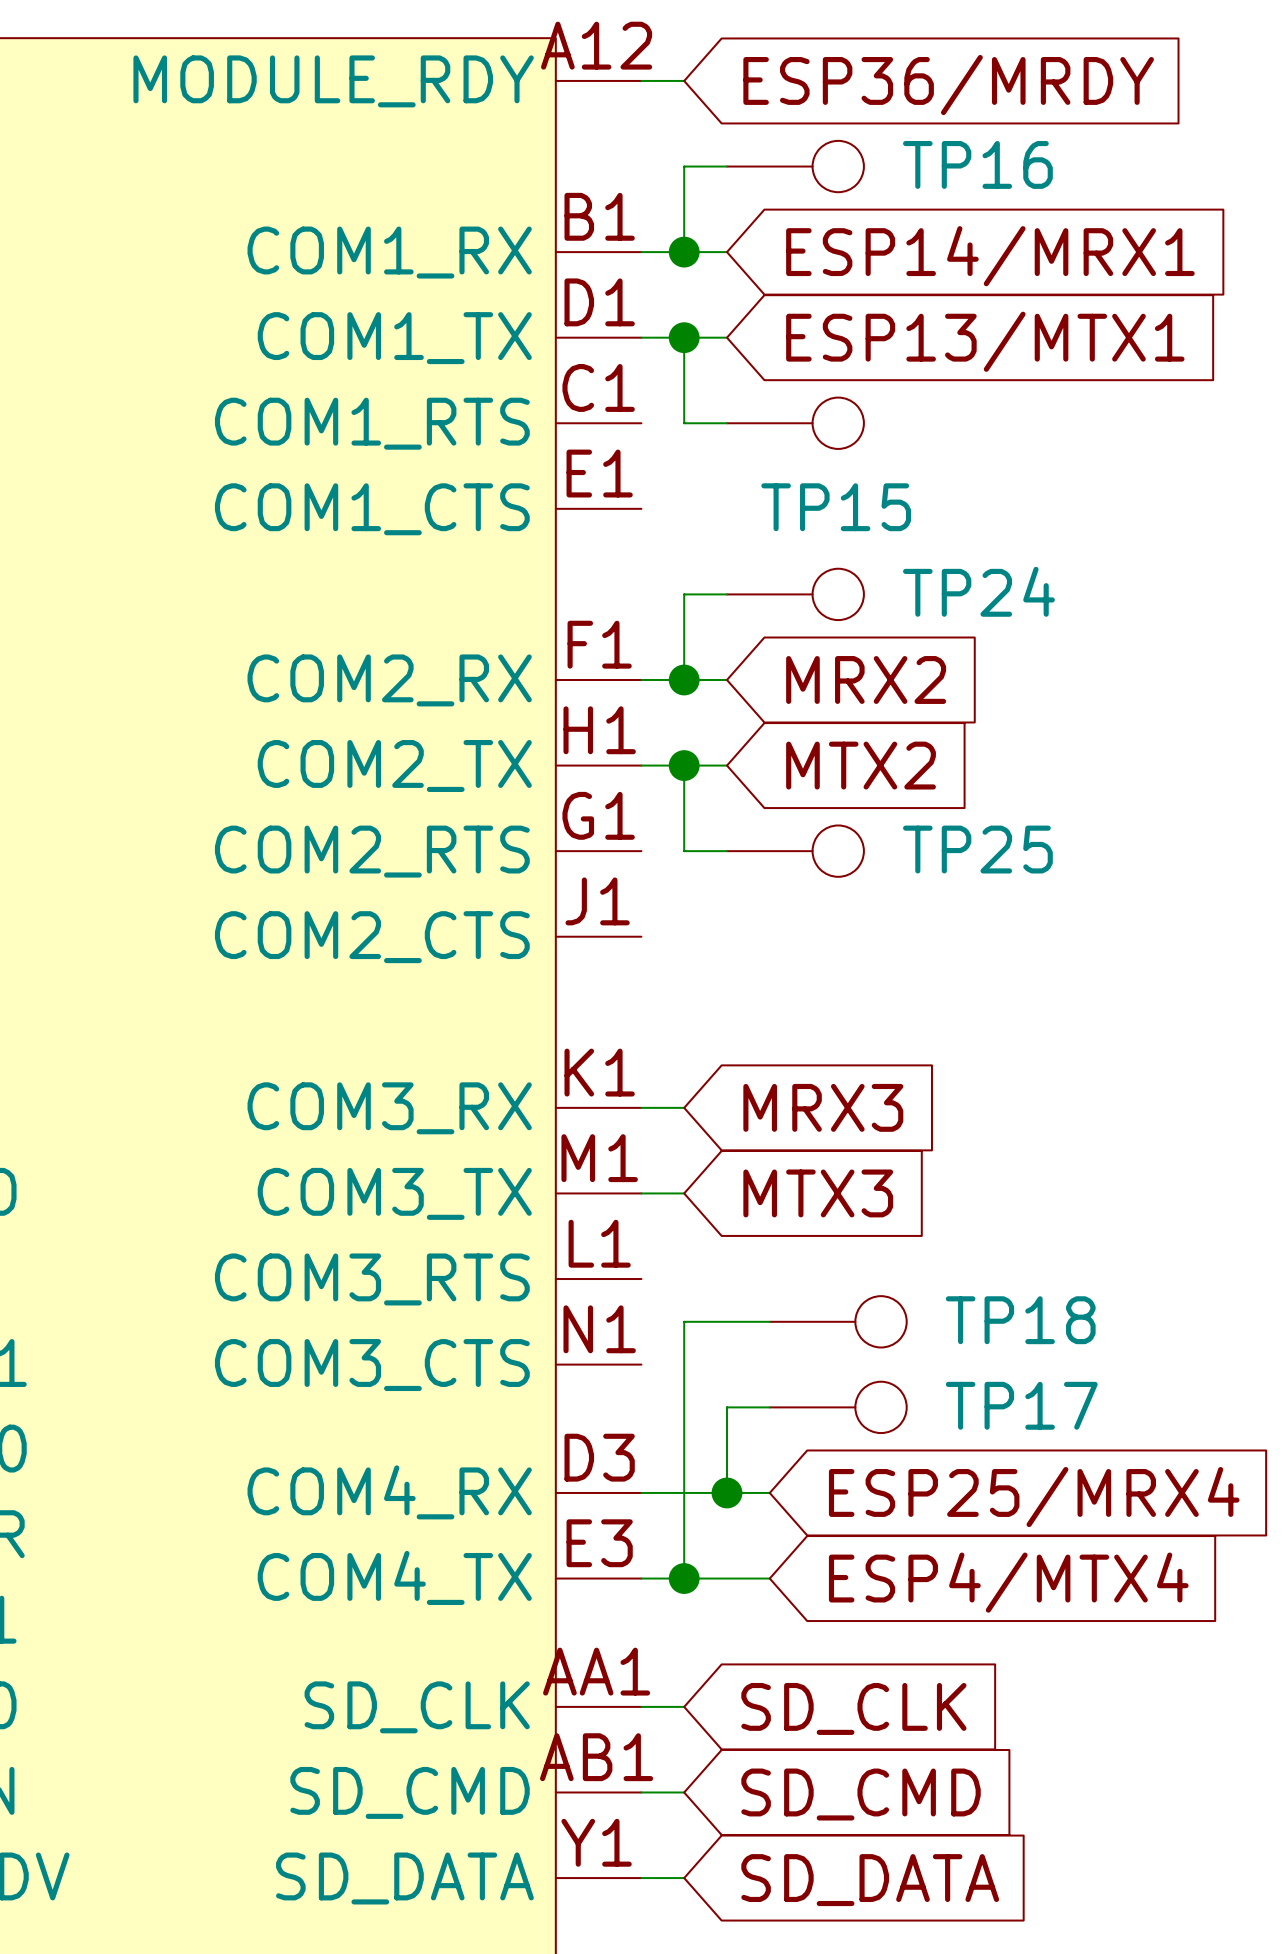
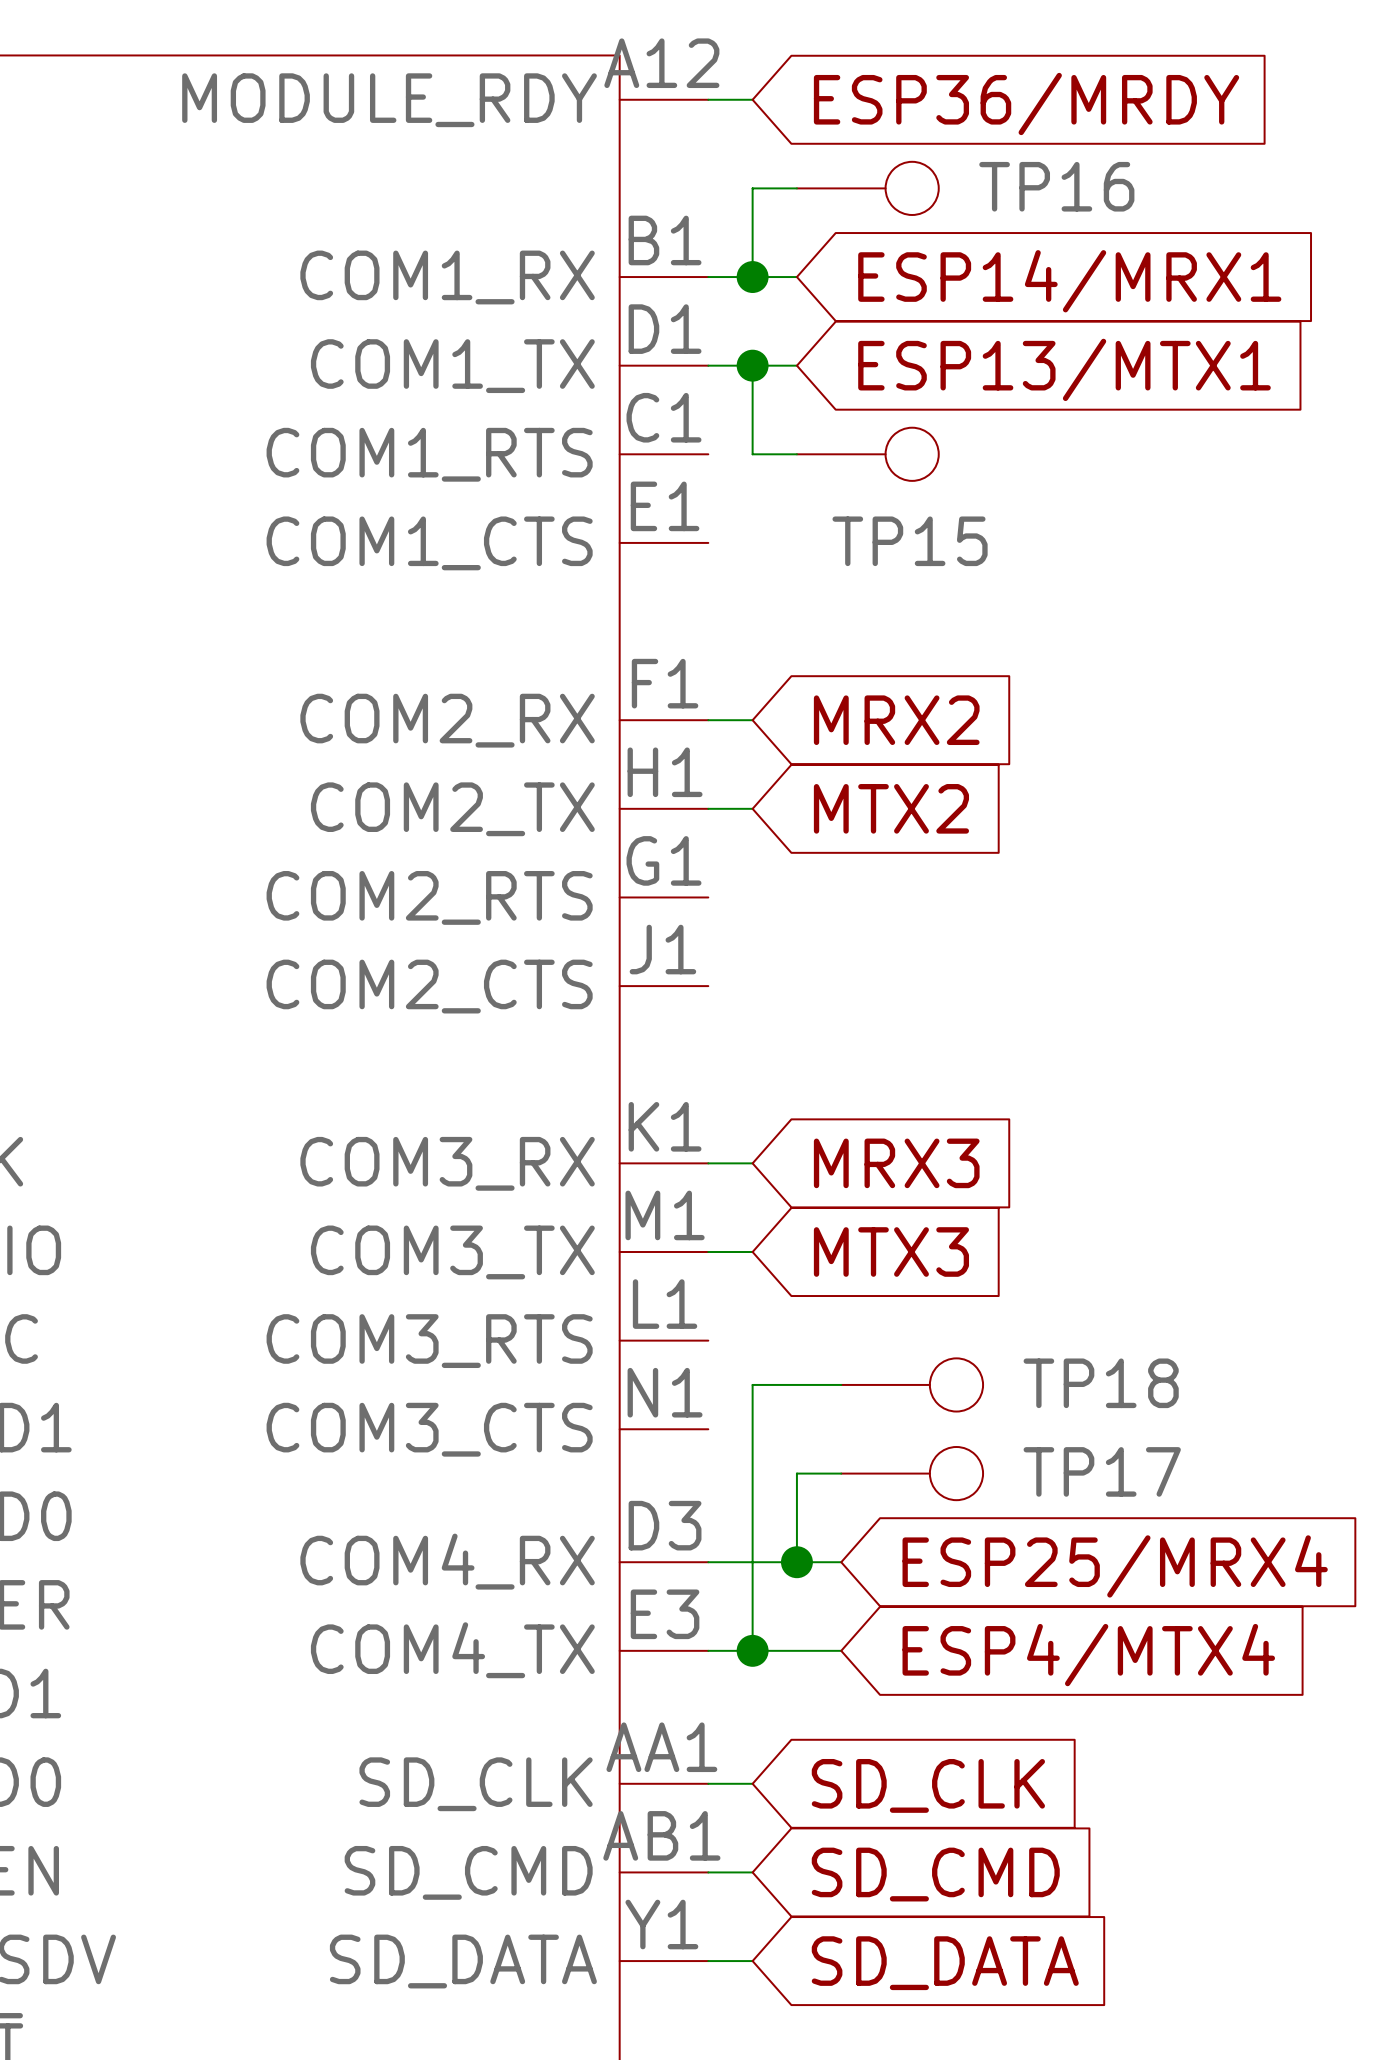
wire: (726, 594) (684, 594) (684, 679) (726, 679) -> none
TP24: (795, 594) -> none
junction: (684, 679) -> none
global label position: MRX2 (866, 679) -> MRX2 (896, 720)
junction: (684, 765) -> none
wire: (726, 765) (684, 765) (684, 851) (726, 851) -> none
global label position: MTX2 (861, 765) -> MTX2 (891, 808)
TP25: (795, 851) -> none

